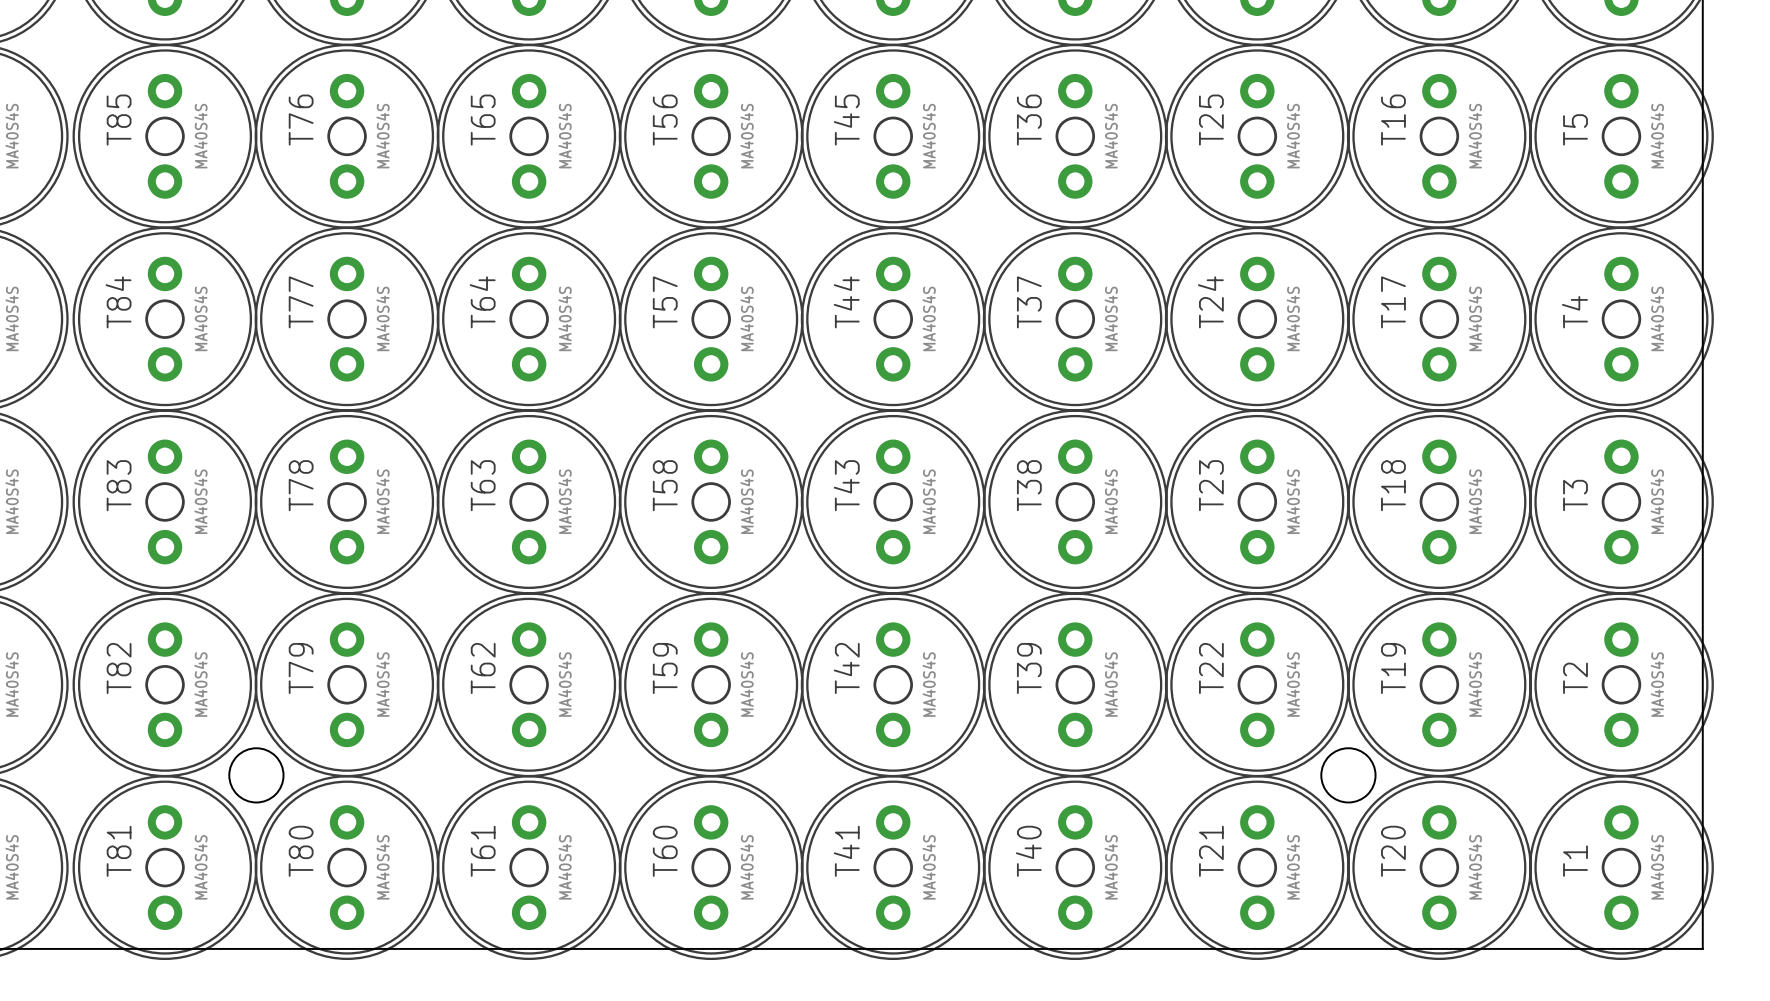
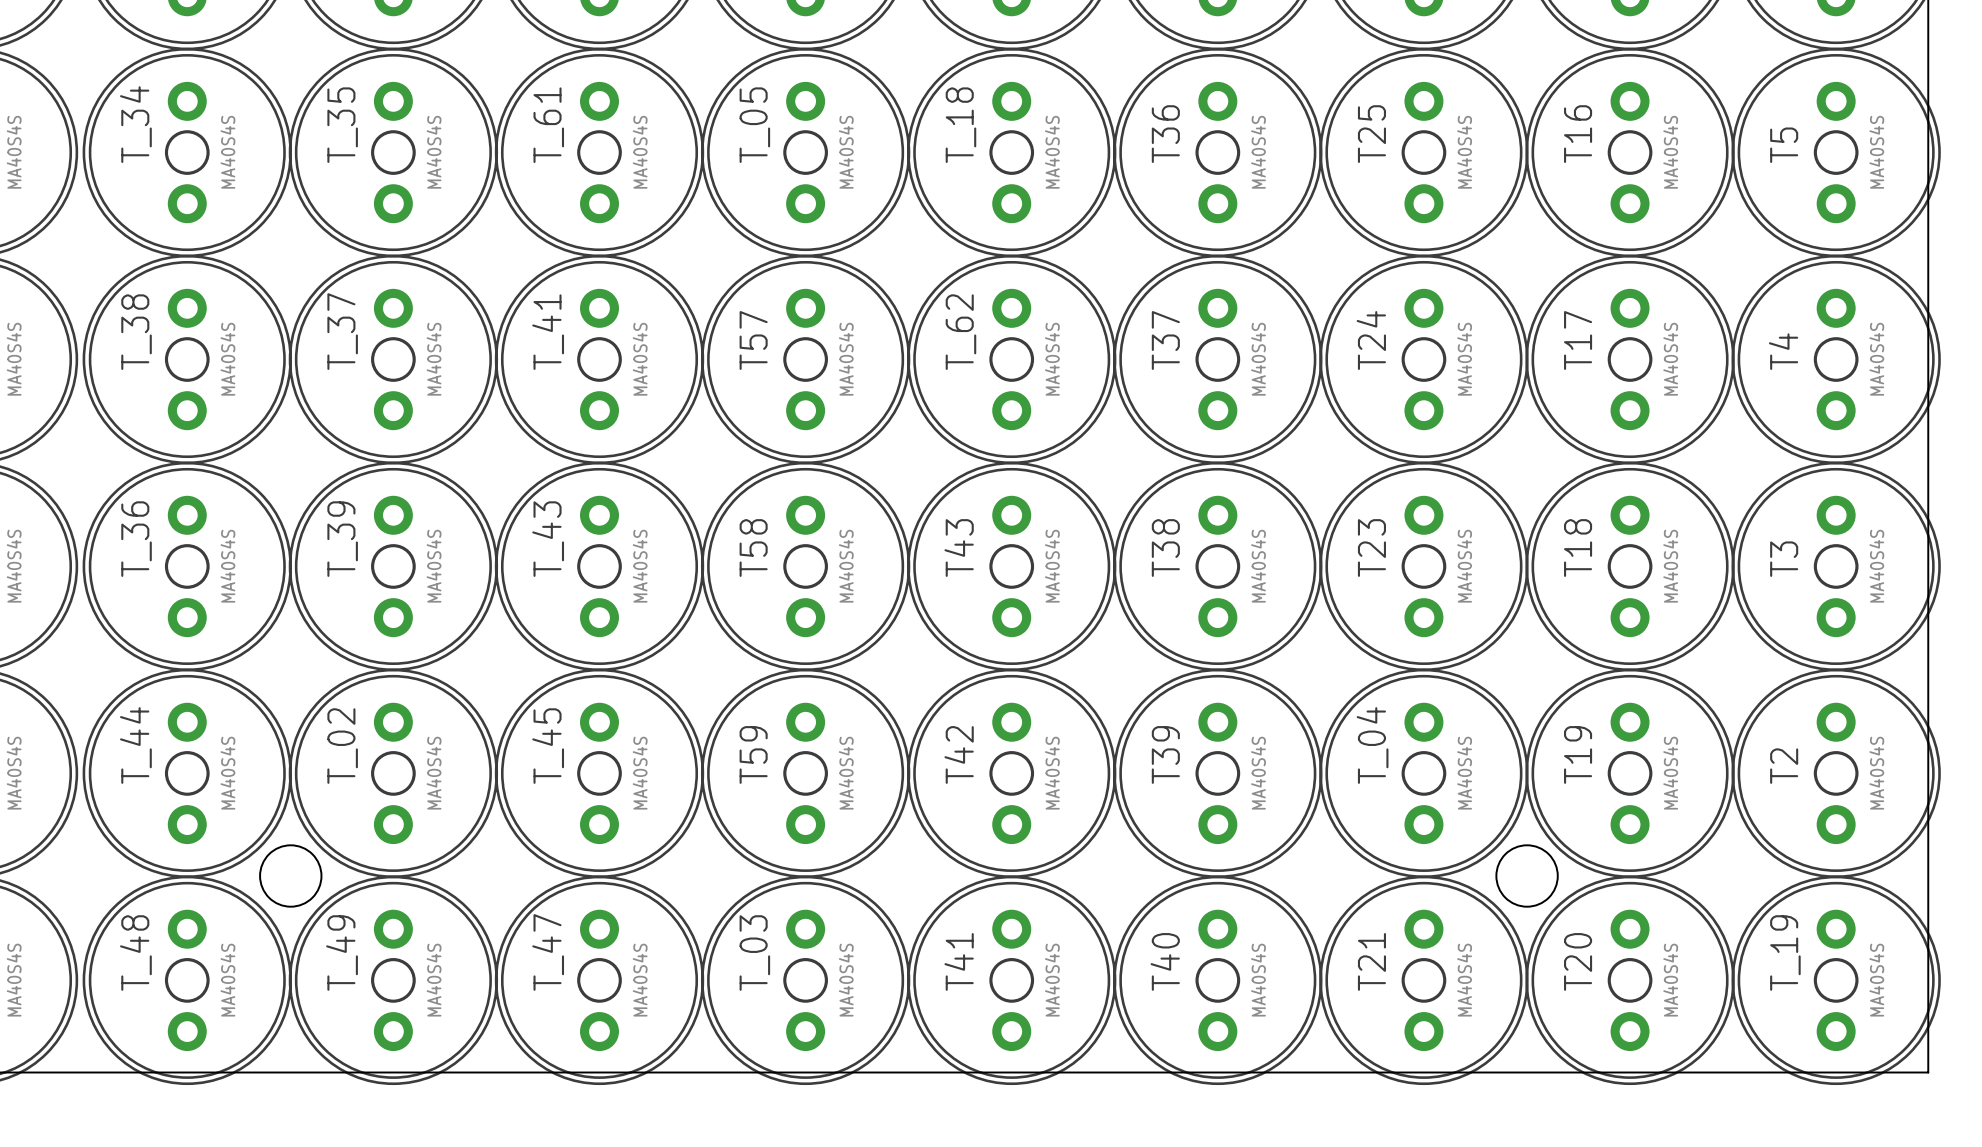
T85 name: T85 (119, 120) -> T_34 (135, 124)
T76 name: T76 (301, 120) -> T_35 (342, 125)
T65 name: T65 (483, 120) -> T_61 (548, 125)
T56 name: T56 (665, 120) -> T_05 (754, 125)
T45 name: T45 (846, 120) -> T_18 (960, 125)
T84 name: T84 (118, 302) -> T_38 (136, 332)
T77 name: T77 (301, 302) -> T_37 (342, 331)
T64 name: T64 (482, 302) -> T_41 (548, 332)
T44 name: T44 (846, 302) -> T_62 (960, 332)
T83 name: T83 (119, 485) -> T_36 (136, 539)
T78 name: T78 (301, 485) -> T_39 (342, 539)
T63 name: T63 (483, 485) -> T_43 (548, 539)
T82 name: T82 (119, 668) -> T_44 (135, 745)
T79 name: T79 (301, 668) -> T_02 (342, 746)
T62 name: T62 (483, 668) -> T_45 (548, 746)
T22 name: T22 (1211, 668) -> T_04 (1372, 745)
T81 name: T81 (119, 851) -> T_48 (135, 953)
T80 name: T80 (301, 851) -> T_49 (342, 953)
T61 name: T61 (483, 851) -> T_47 (548, 952)
T60 name: T60 (665, 851) -> T_03 (754, 953)
T1 name: T1 (1575, 861) -> T_19 (1785, 953)

